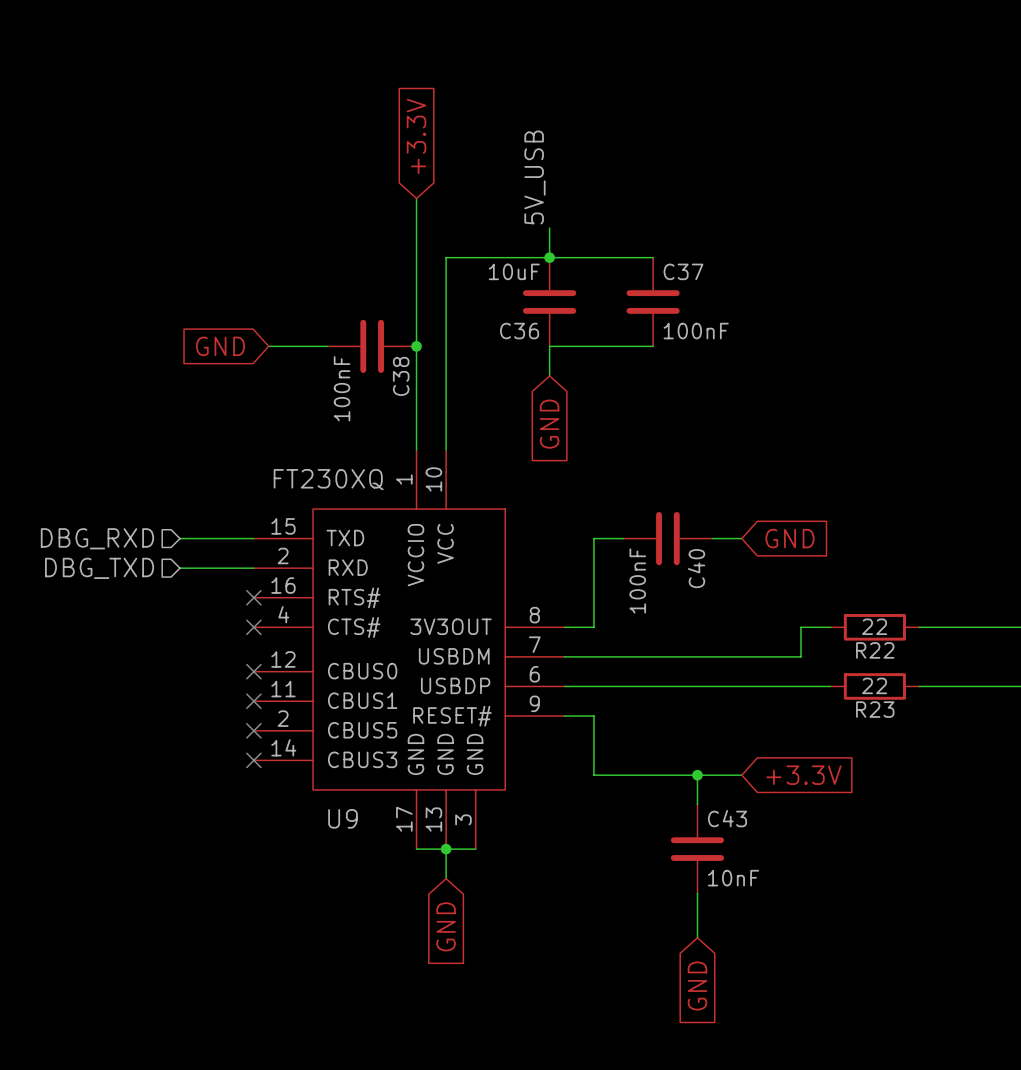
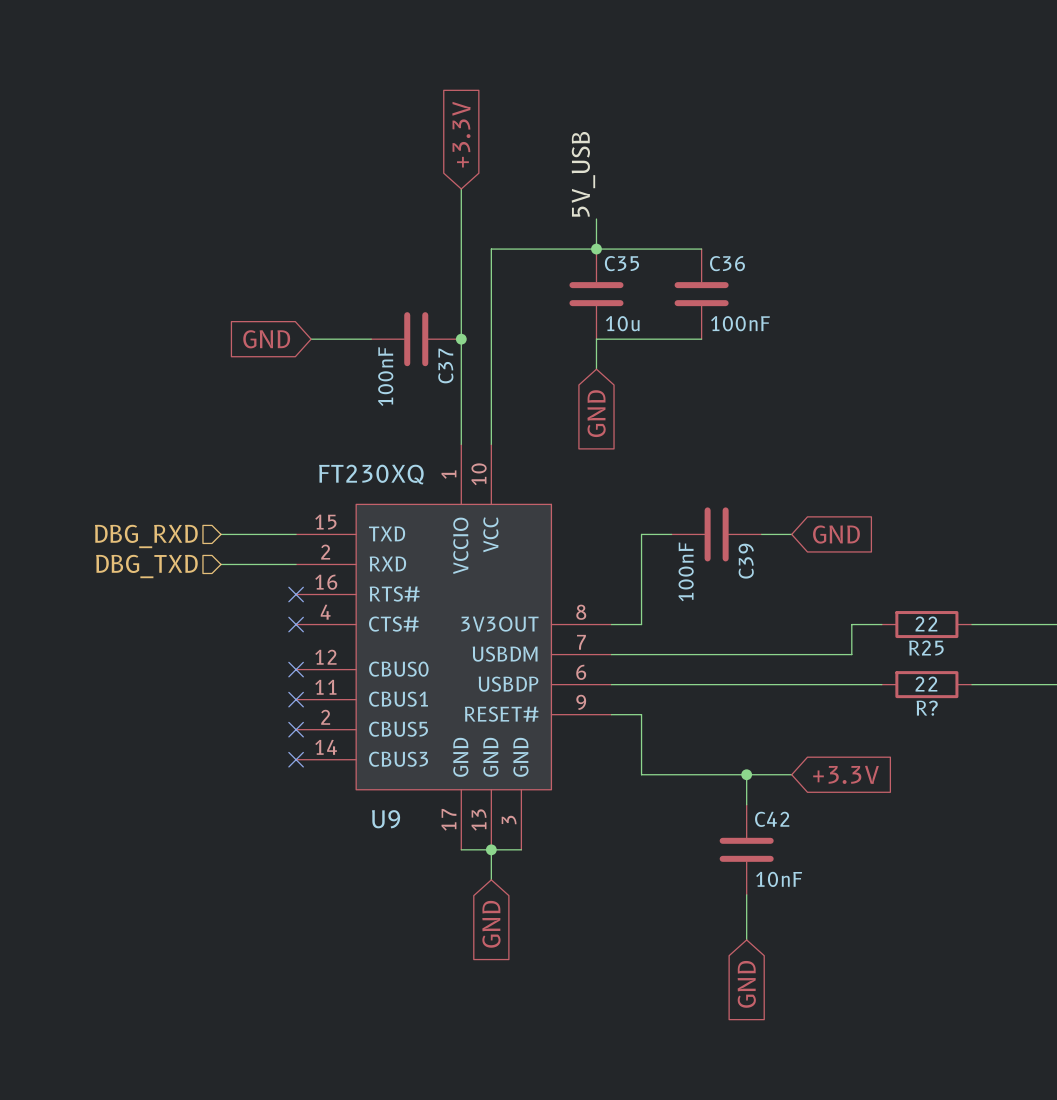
C36 value: 10uF (514, 271) -> 10u (622, 323)
C37 name: C37 (683, 271) -> C36 (727, 263)
C36 name: C36 (519, 331) -> C35 (621, 263)
C38 name: C38 (401, 376) -> C37 (445, 366)
C40 name: C40 (696, 568) -> C39 (746, 561)
R22 name: R22 (875, 650) -> R25 (926, 648)
R23 name: R23 (875, 709) -> R? (927, 708)
C43 name: C43 (727, 818) -> C42 (772, 819)

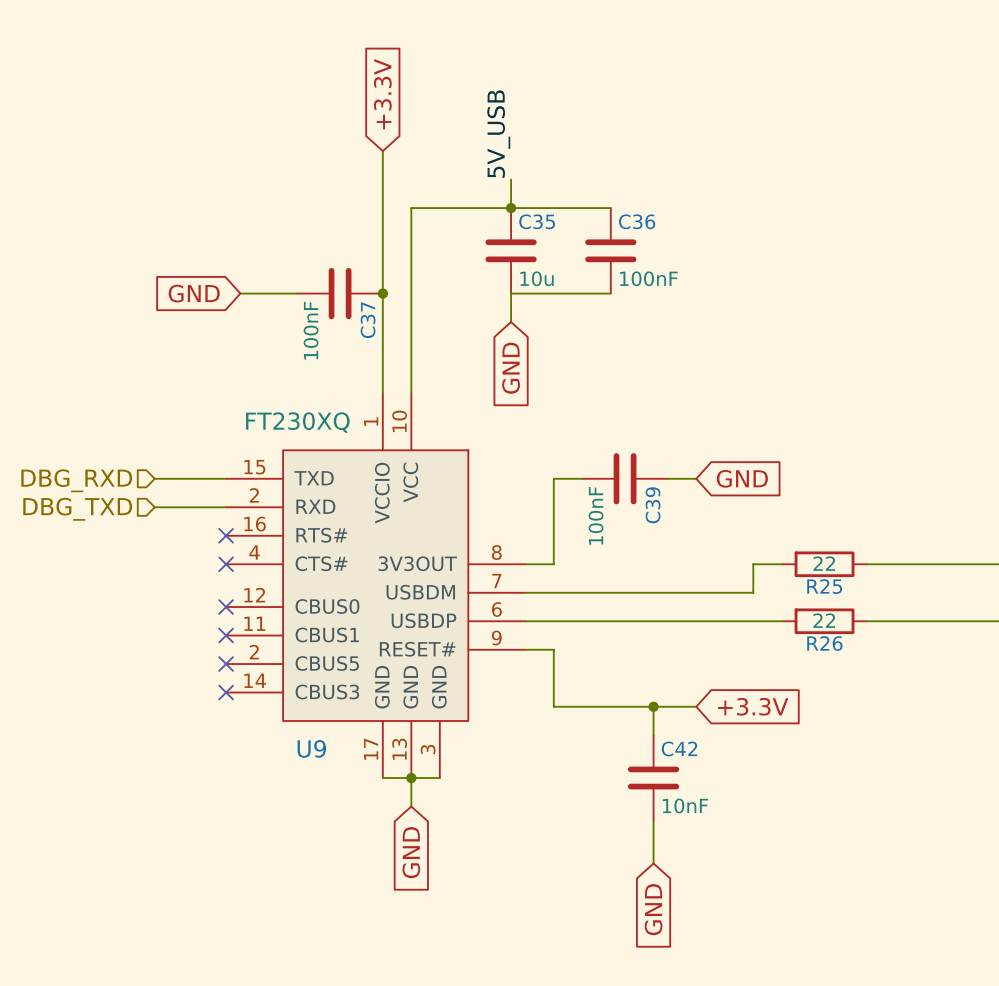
R? name: R? (927, 708) -> R26 (824, 643)

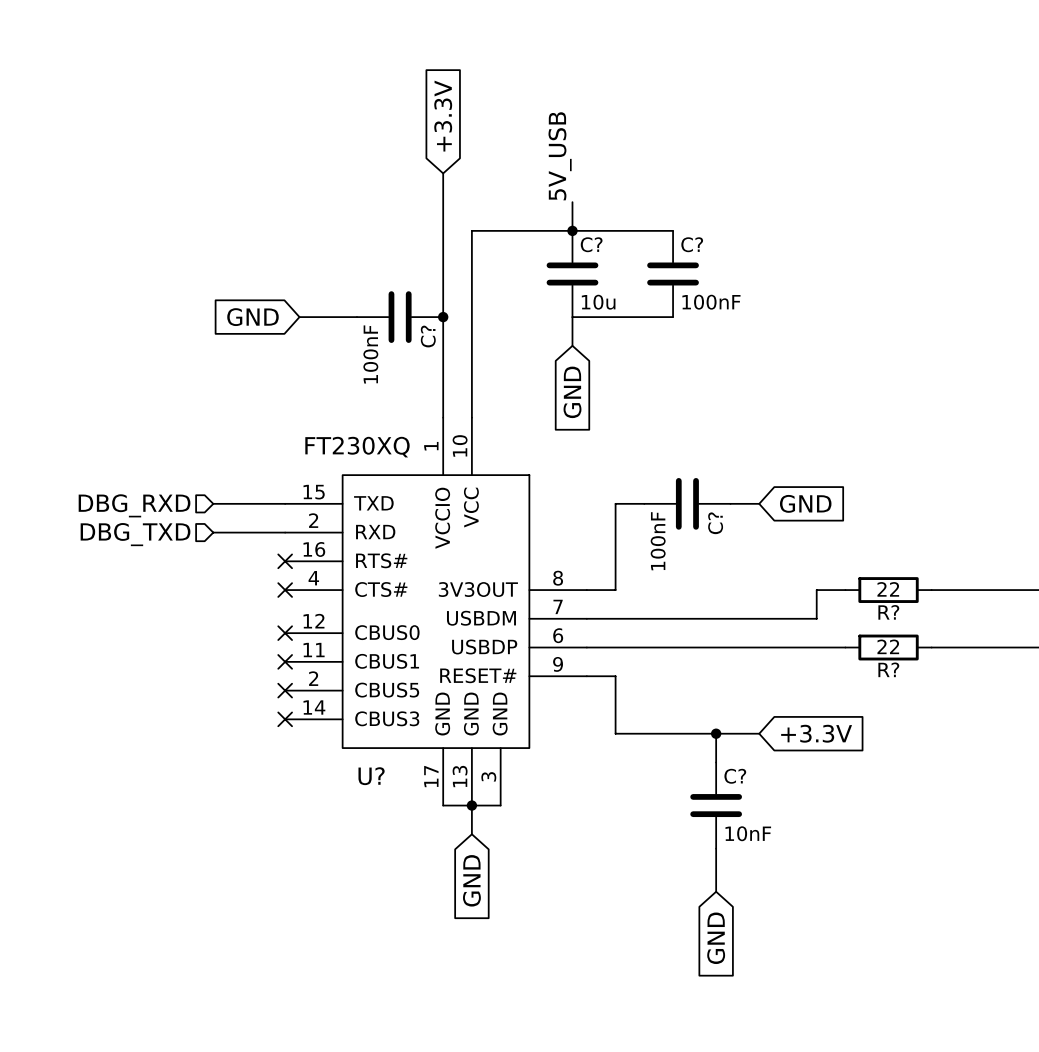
C35 name: C35 (537, 221) -> C? (591, 244)
C36 name: C36 (637, 221) -> C? (692, 244)
C37 name: C37 (368, 320) -> C? (428, 336)
C39 name: C39 (653, 505) -> C? (715, 523)
R25 name: R25 (824, 586) -> R? (888, 612)
R26 name: R26 (824, 643) -> R? (888, 669)
U9 name: U9 (311, 748) -> U? (371, 776)
C42 name: C42 (679, 748) -> C? (735, 776)

